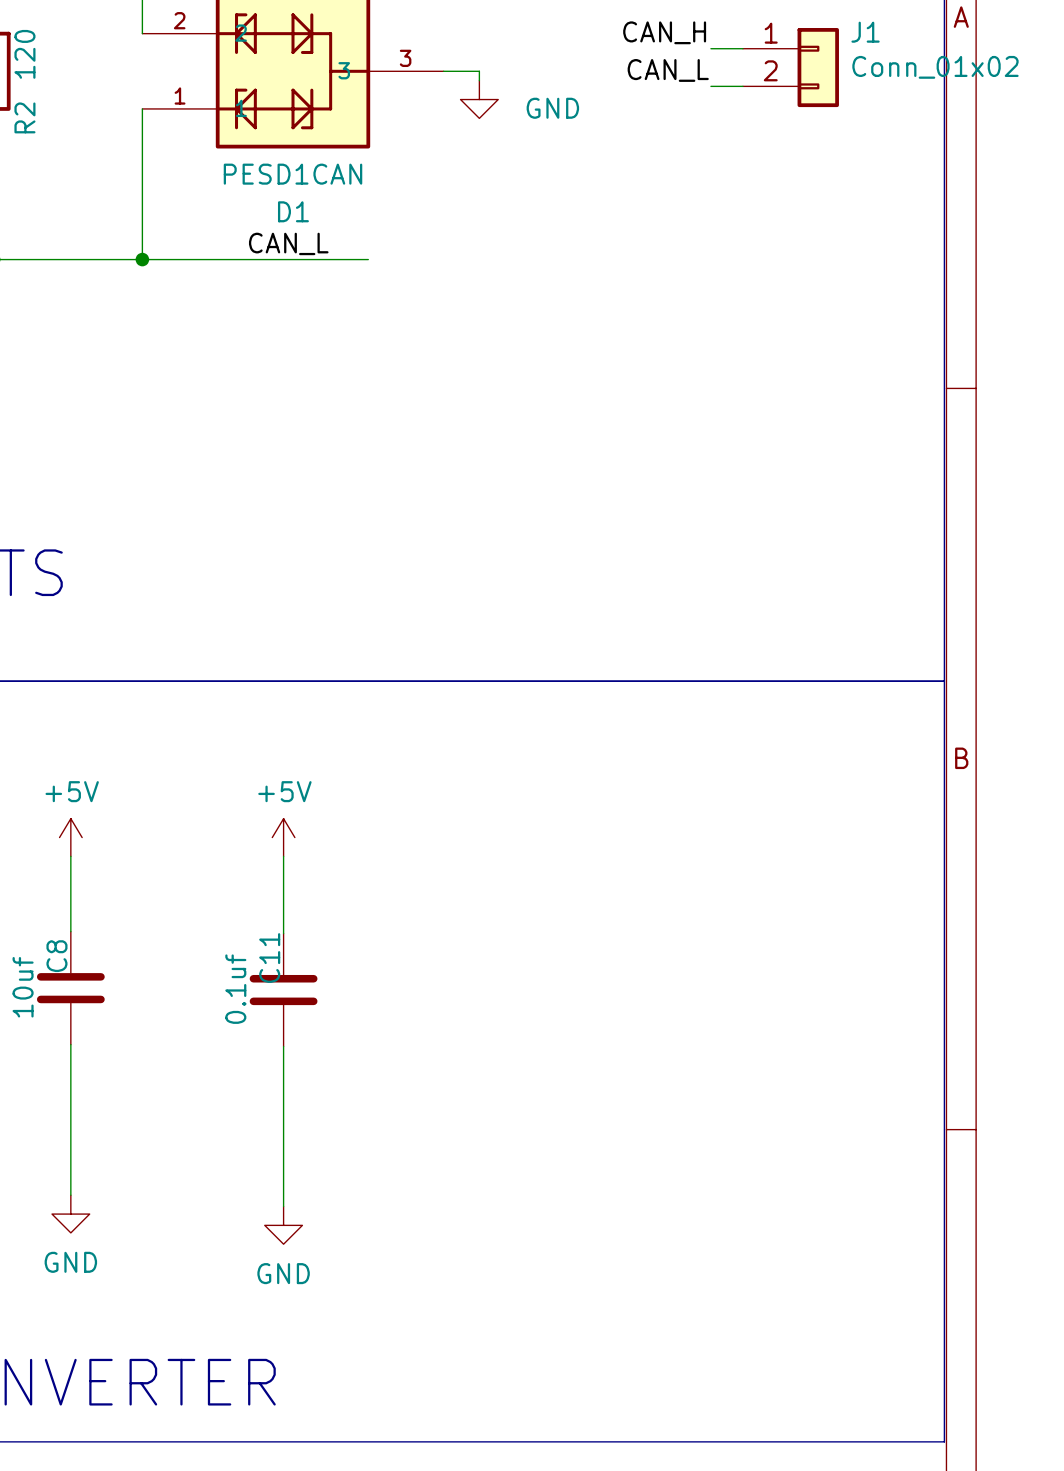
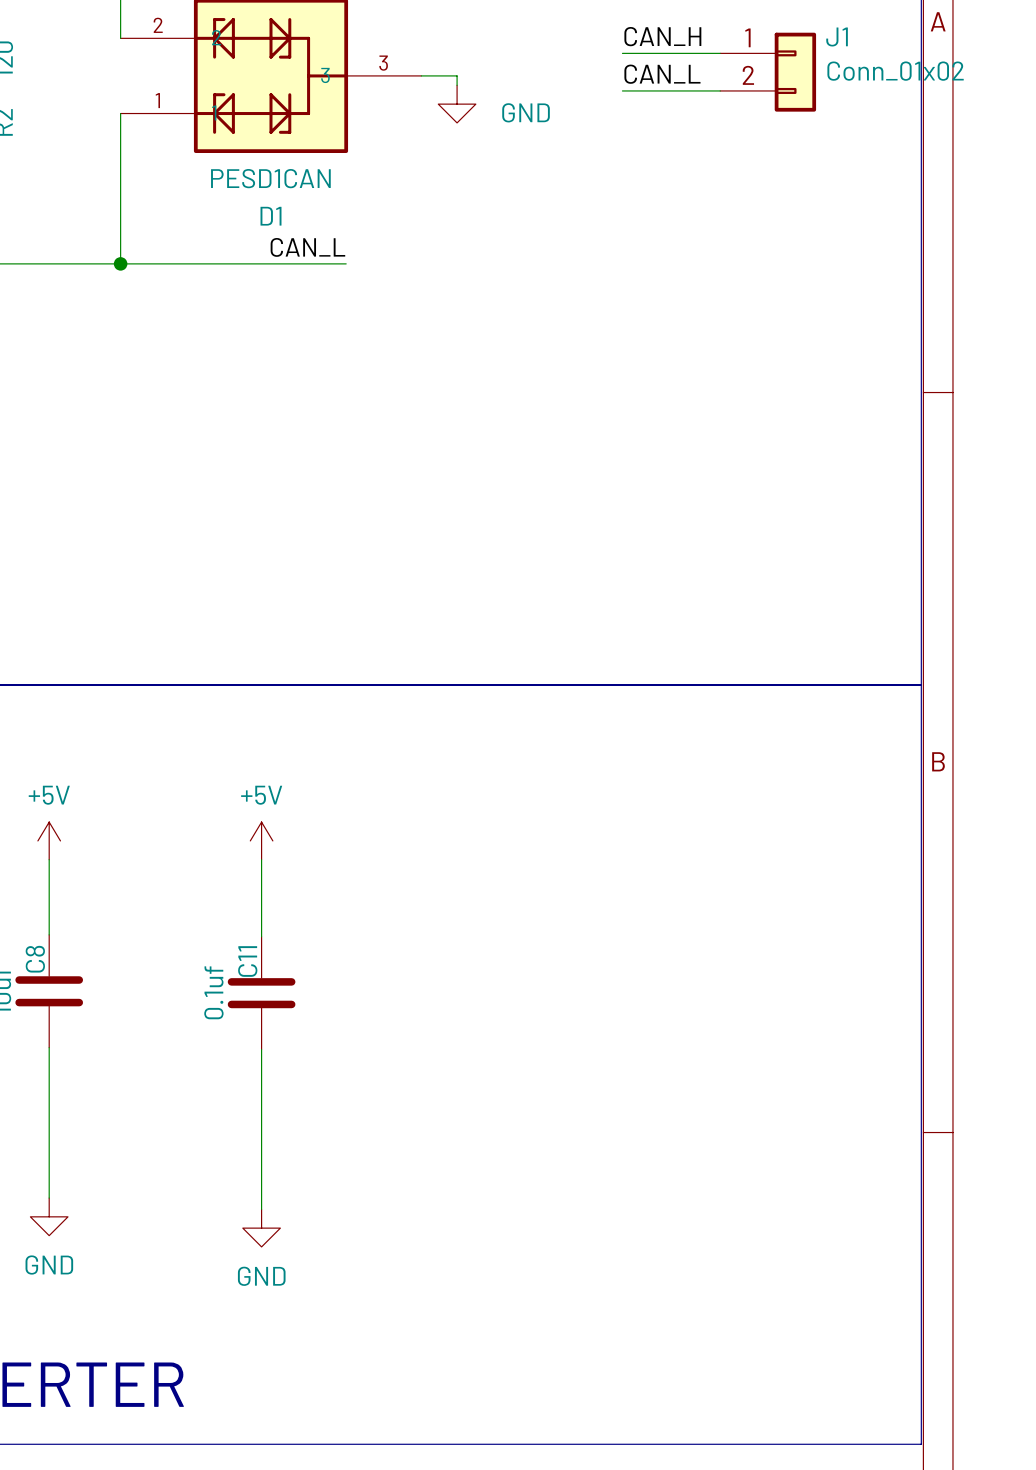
label position: CAN_H (664, 32) -> CAN_H (662, 36)
wire: none -> (622, 53) (688, 53)
label position: CAN_L (668, 70) -> CAN_L (662, 74)
wire: none -> (622, 90) (688, 90)
label position: CAN_L (288, 243) -> CAN_L (307, 247)

